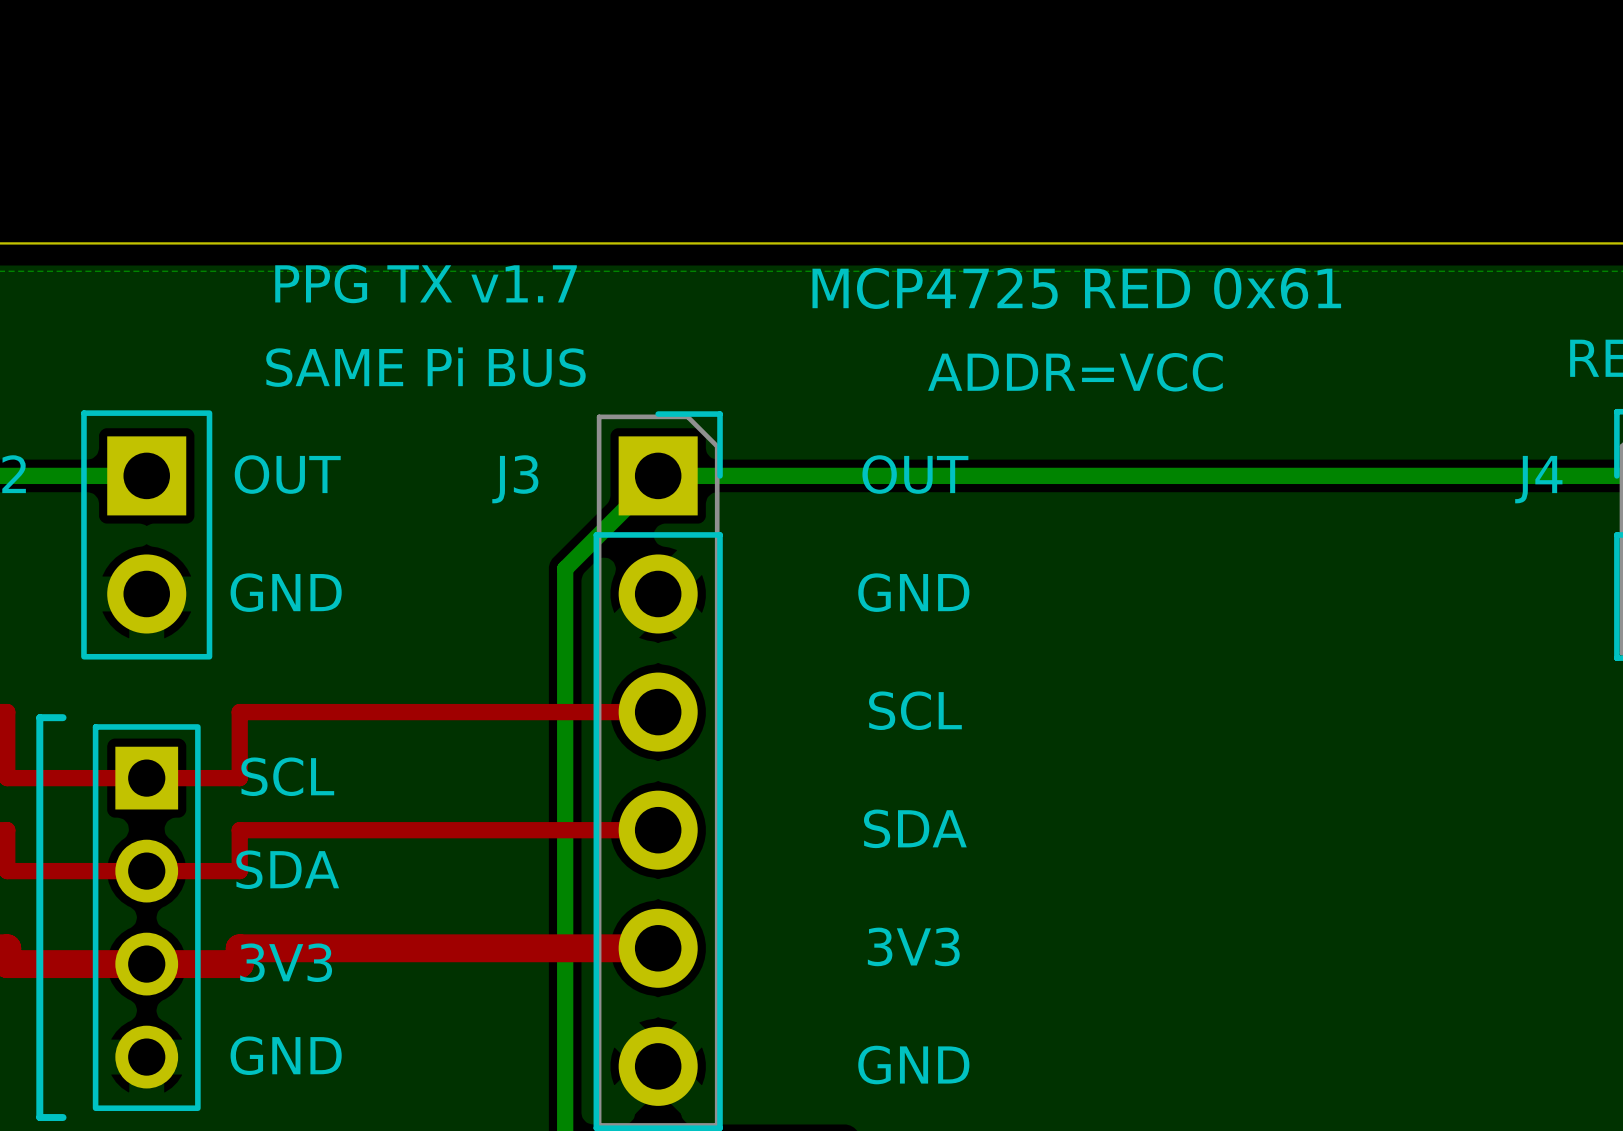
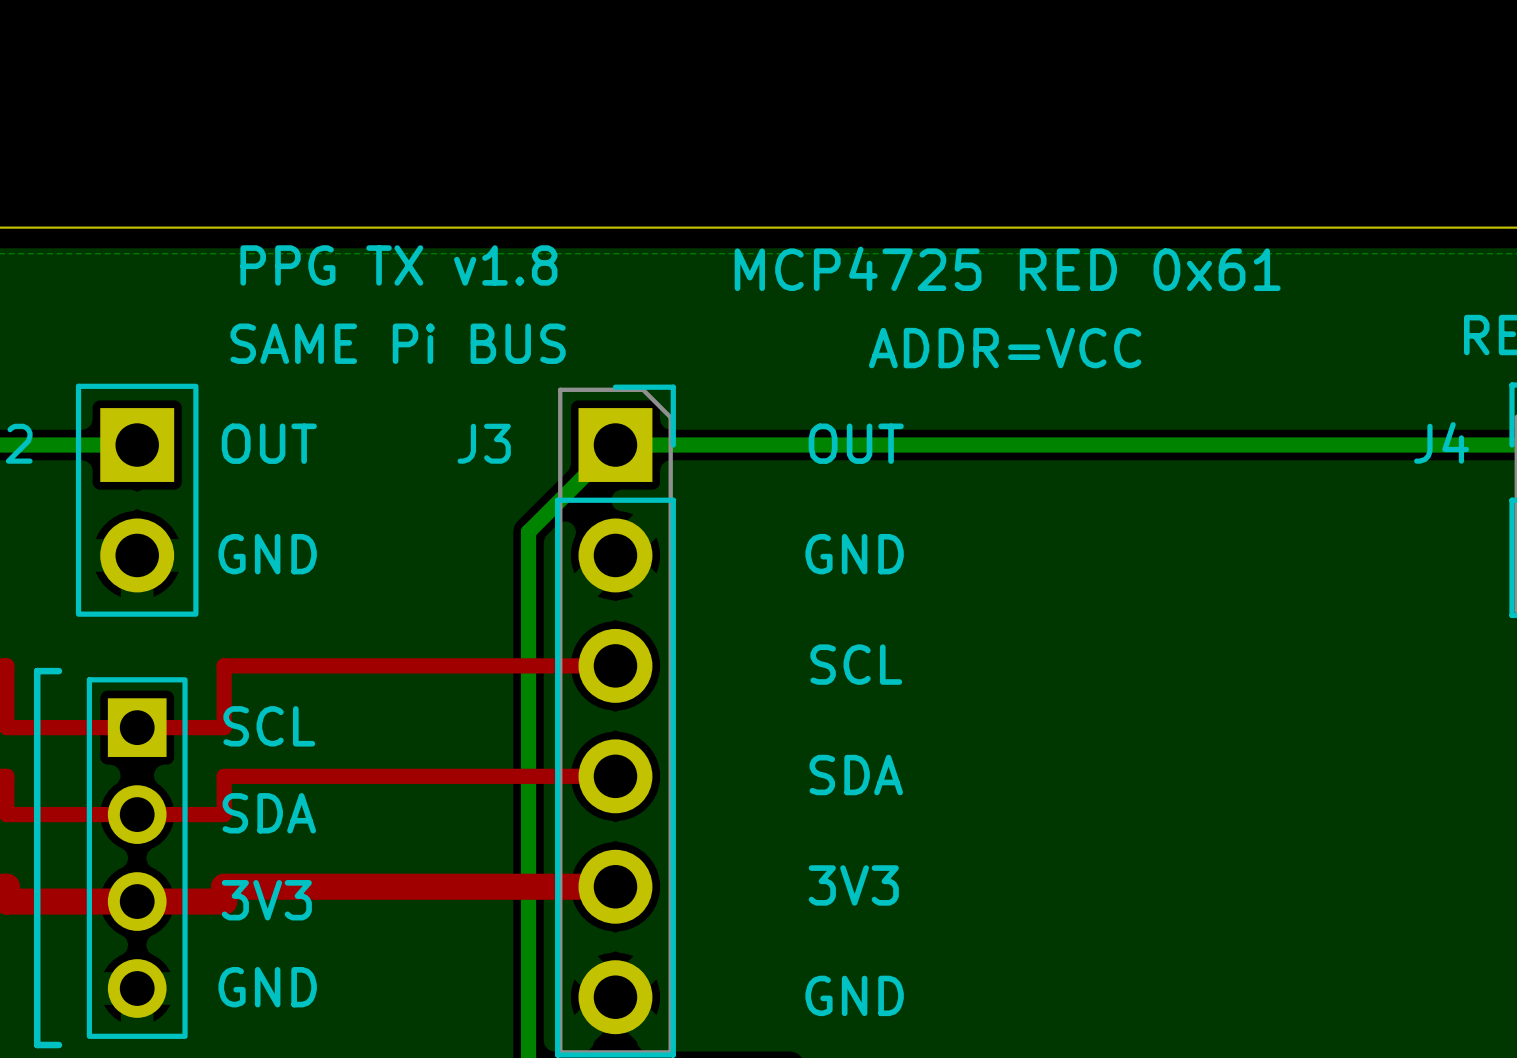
text: PPG TX v1.7 (426, 283) -> PPG TX v1.8 (398, 265)

